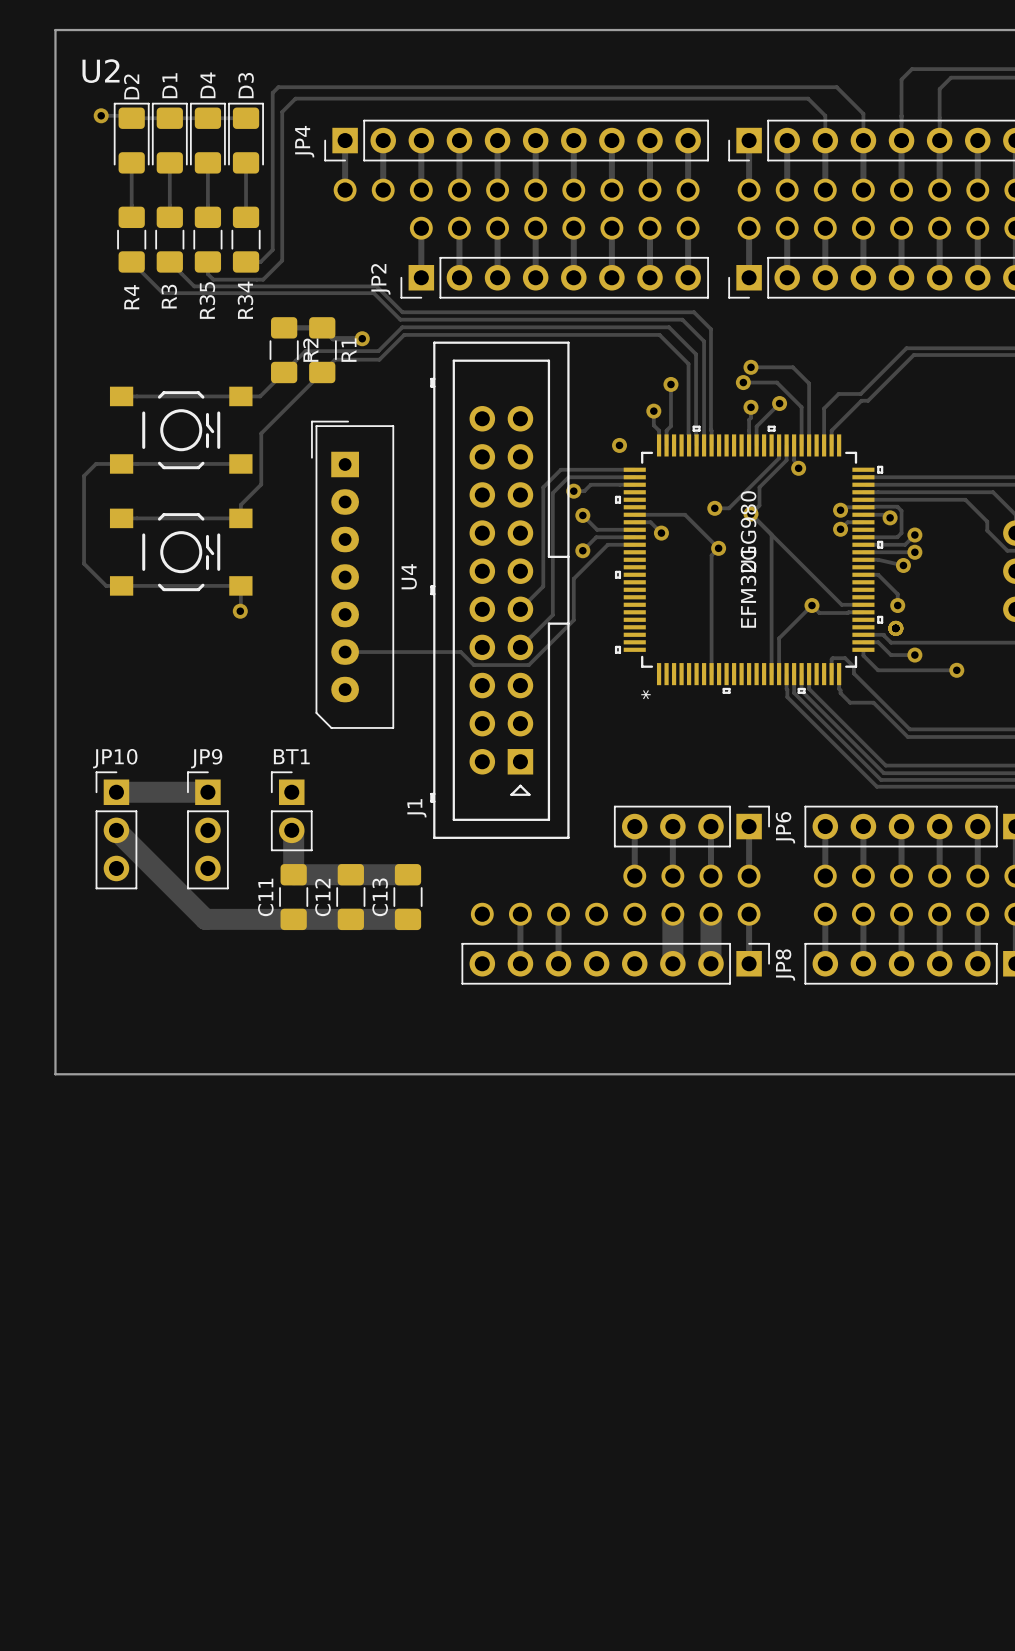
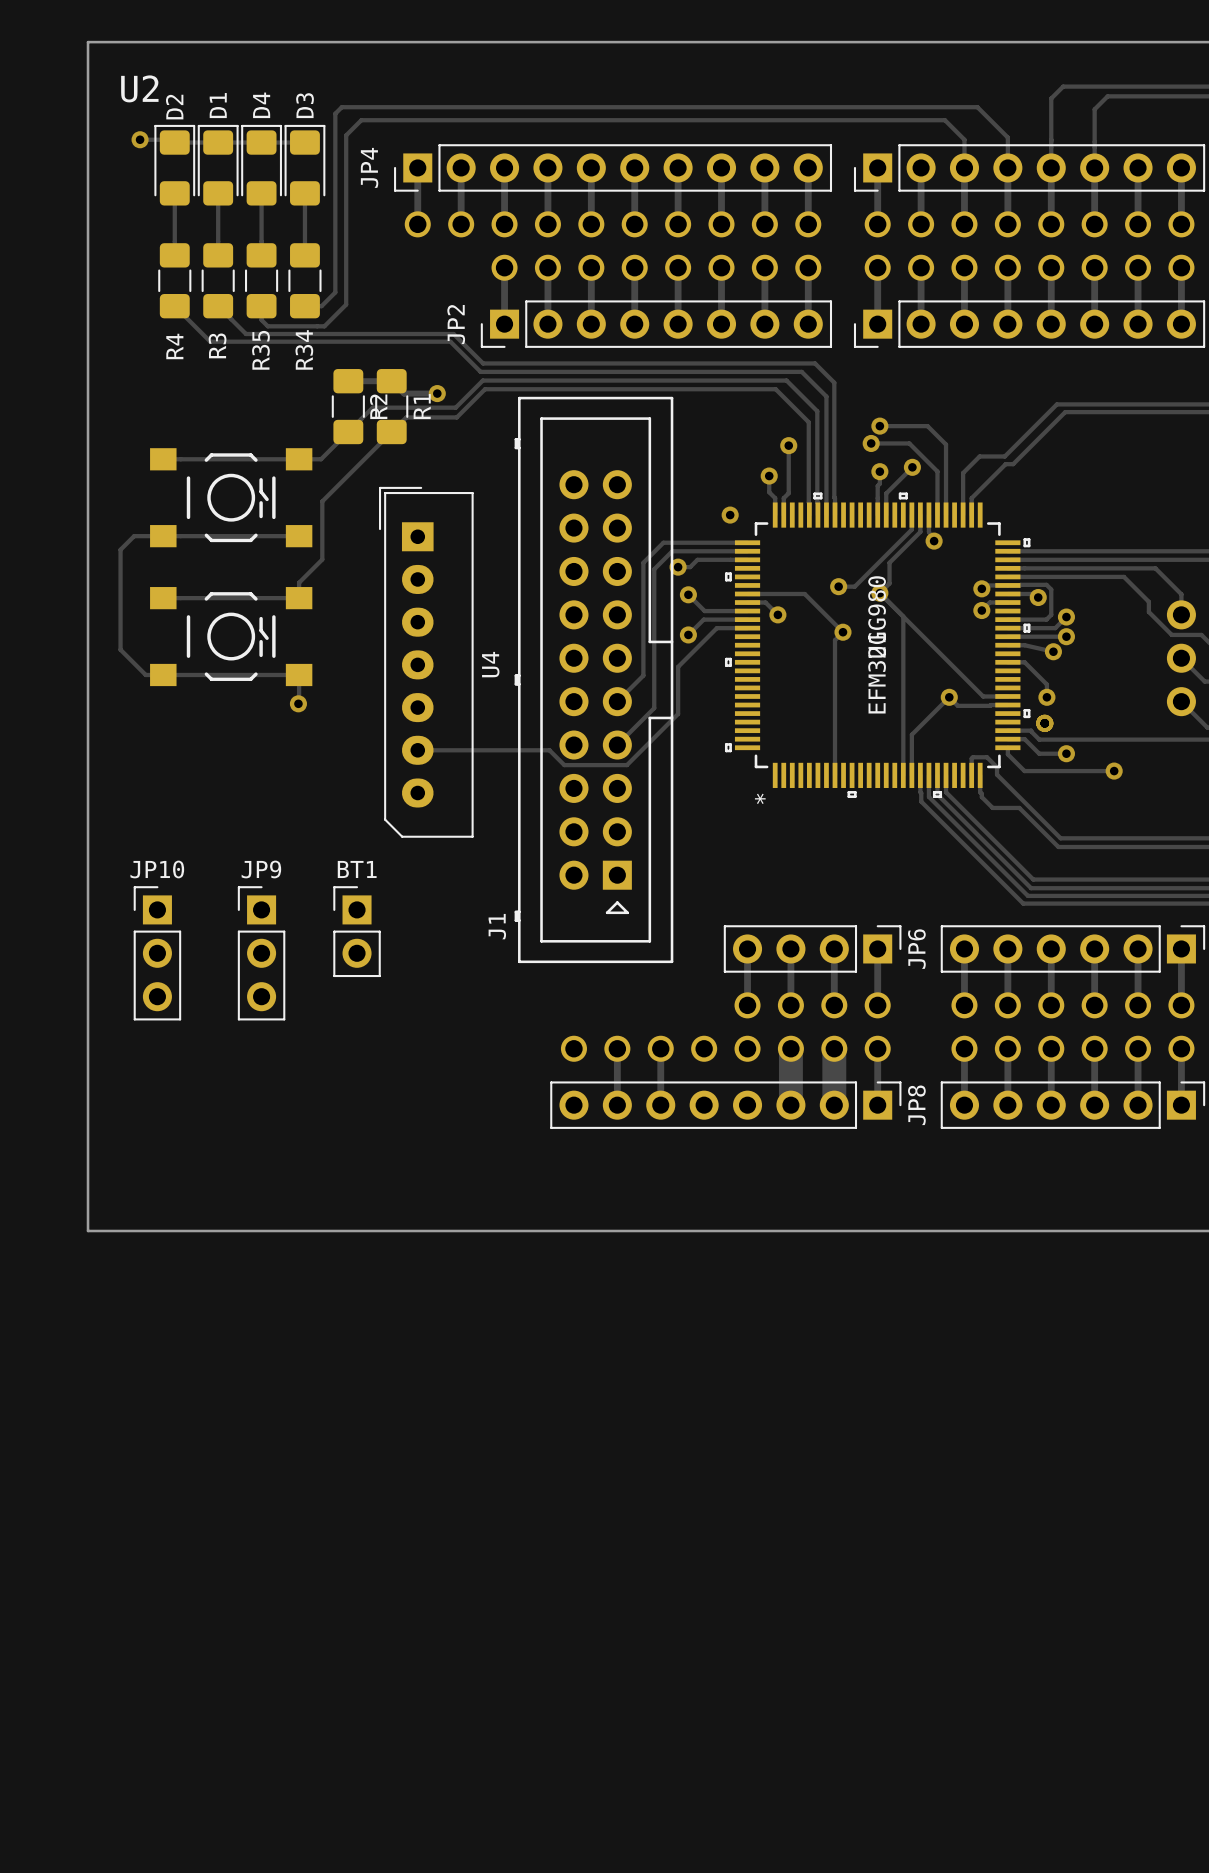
track: (116, 792) (207, 792) -> none
track: (116, 830) (205, 919) (408, 919) -> none
track: (291, 830) (293, 832) (293, 874) (408, 874) -> none
C11: (293, 897) -> none
C12: (350, 897) -> none
C13: (408, 897) -> none

